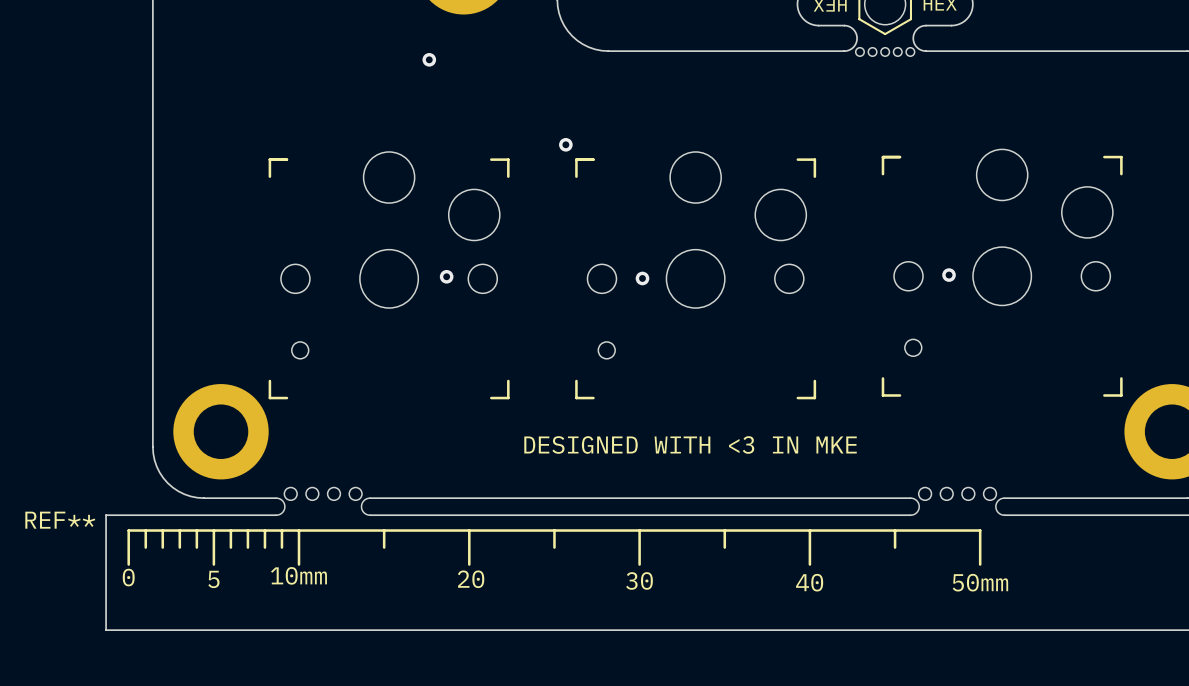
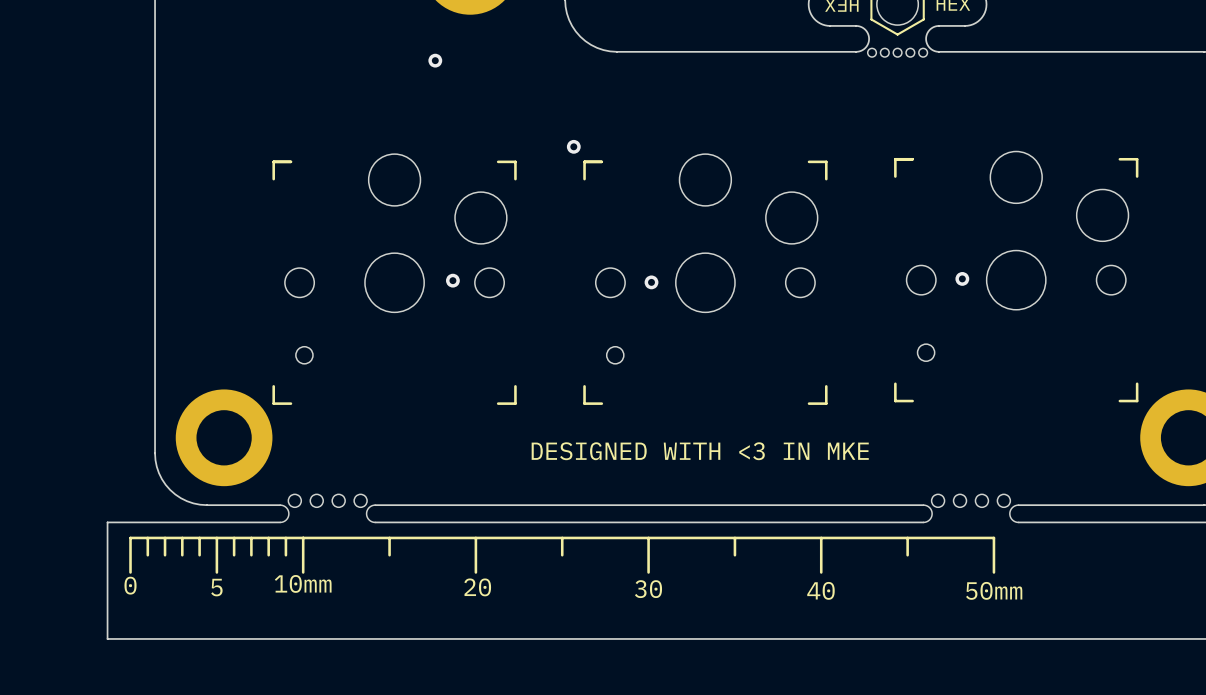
REF**: (554, 547) -> none

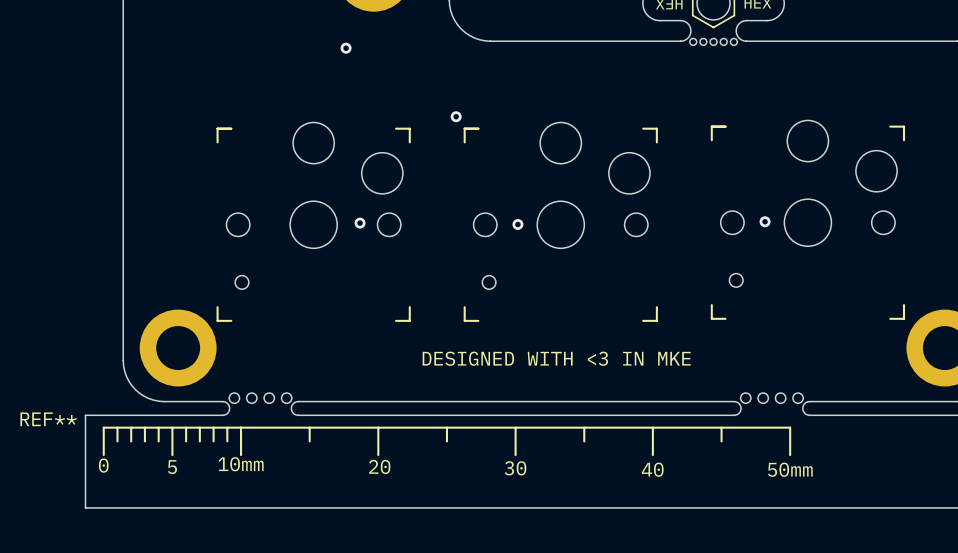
REF**: none -> (446, 441)

